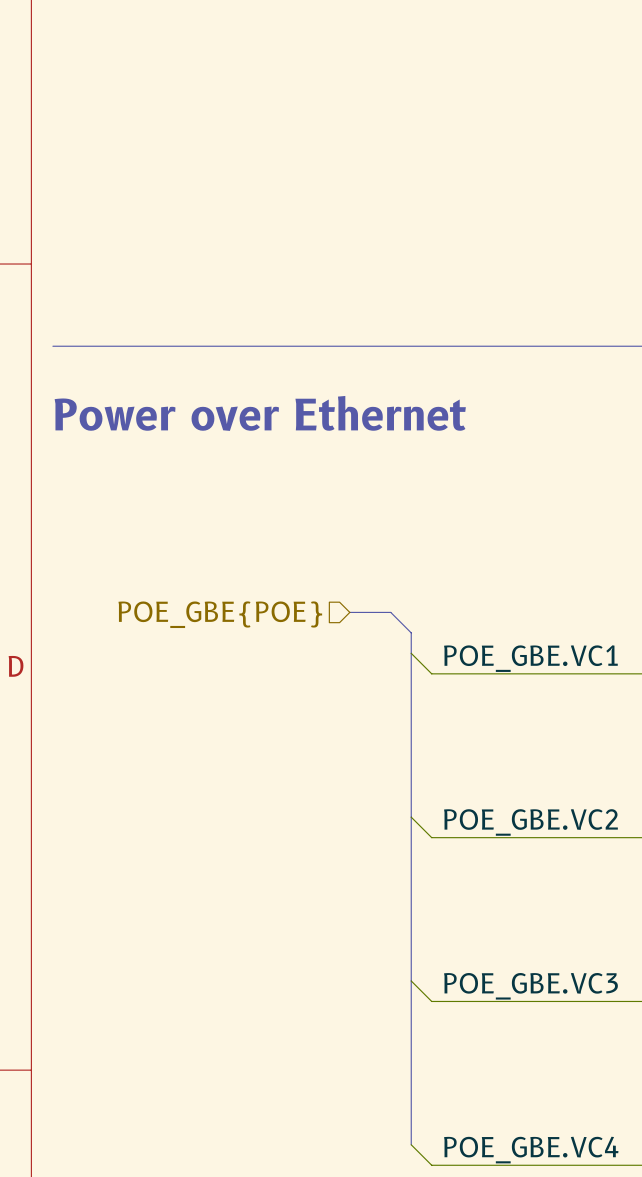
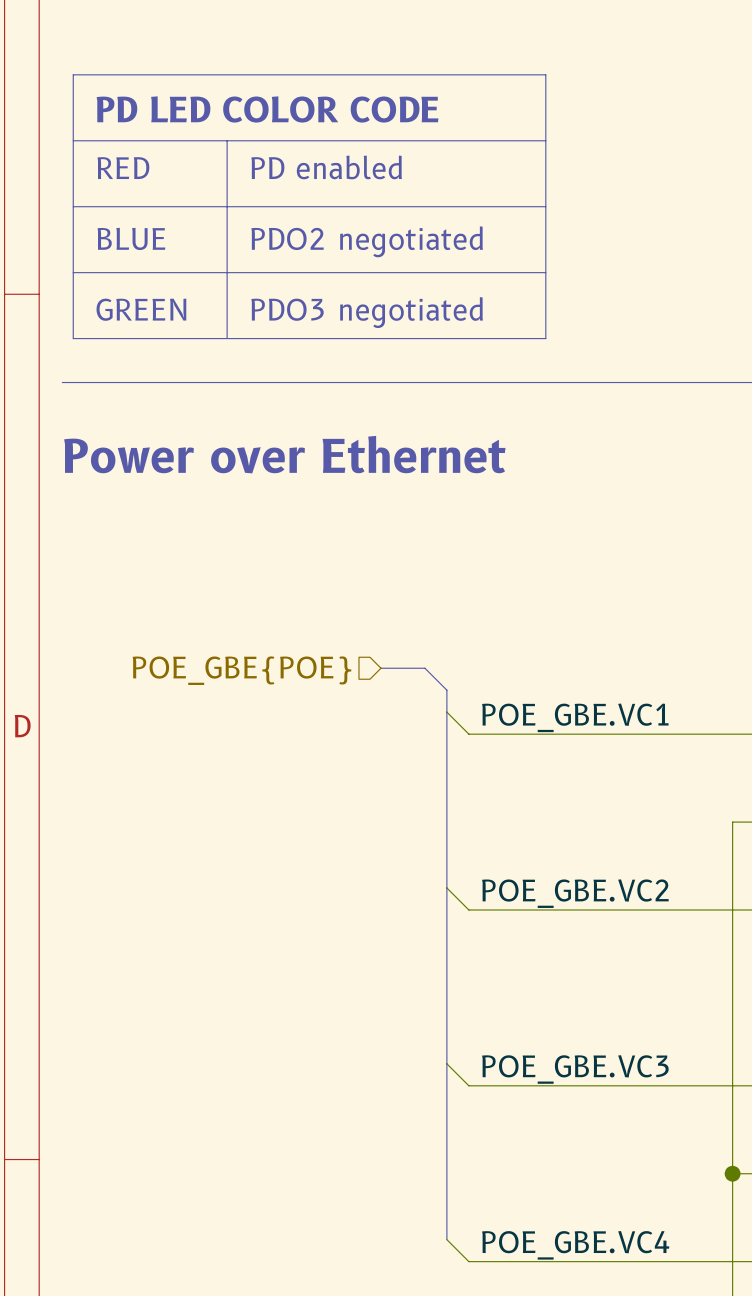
line: none -> (73, 74) (73, 338) (545, 338) (545, 74) (73, 74)
text: none -> PD LED COLOR CODE (267, 109)
line: none -> (73, 140) (545, 140)
line: none -> (227, 140) (227, 338)
text: none -> PD enabled (326, 167)
text: none -> RED (123, 168)
line: none -> (73, 206) (545, 206)
text: none -> BLUE (131, 238)
text: none -> PDO2 negotiated (367, 241)
line: none -> (73, 272) (545, 272)
text: none -> GREEN (141, 309)
text: none -> PDO3 negotiated (367, 312)

